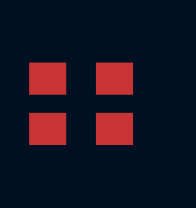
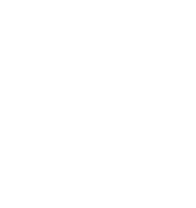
part: (81, 78) -> none
part: (81, 128) -> none

